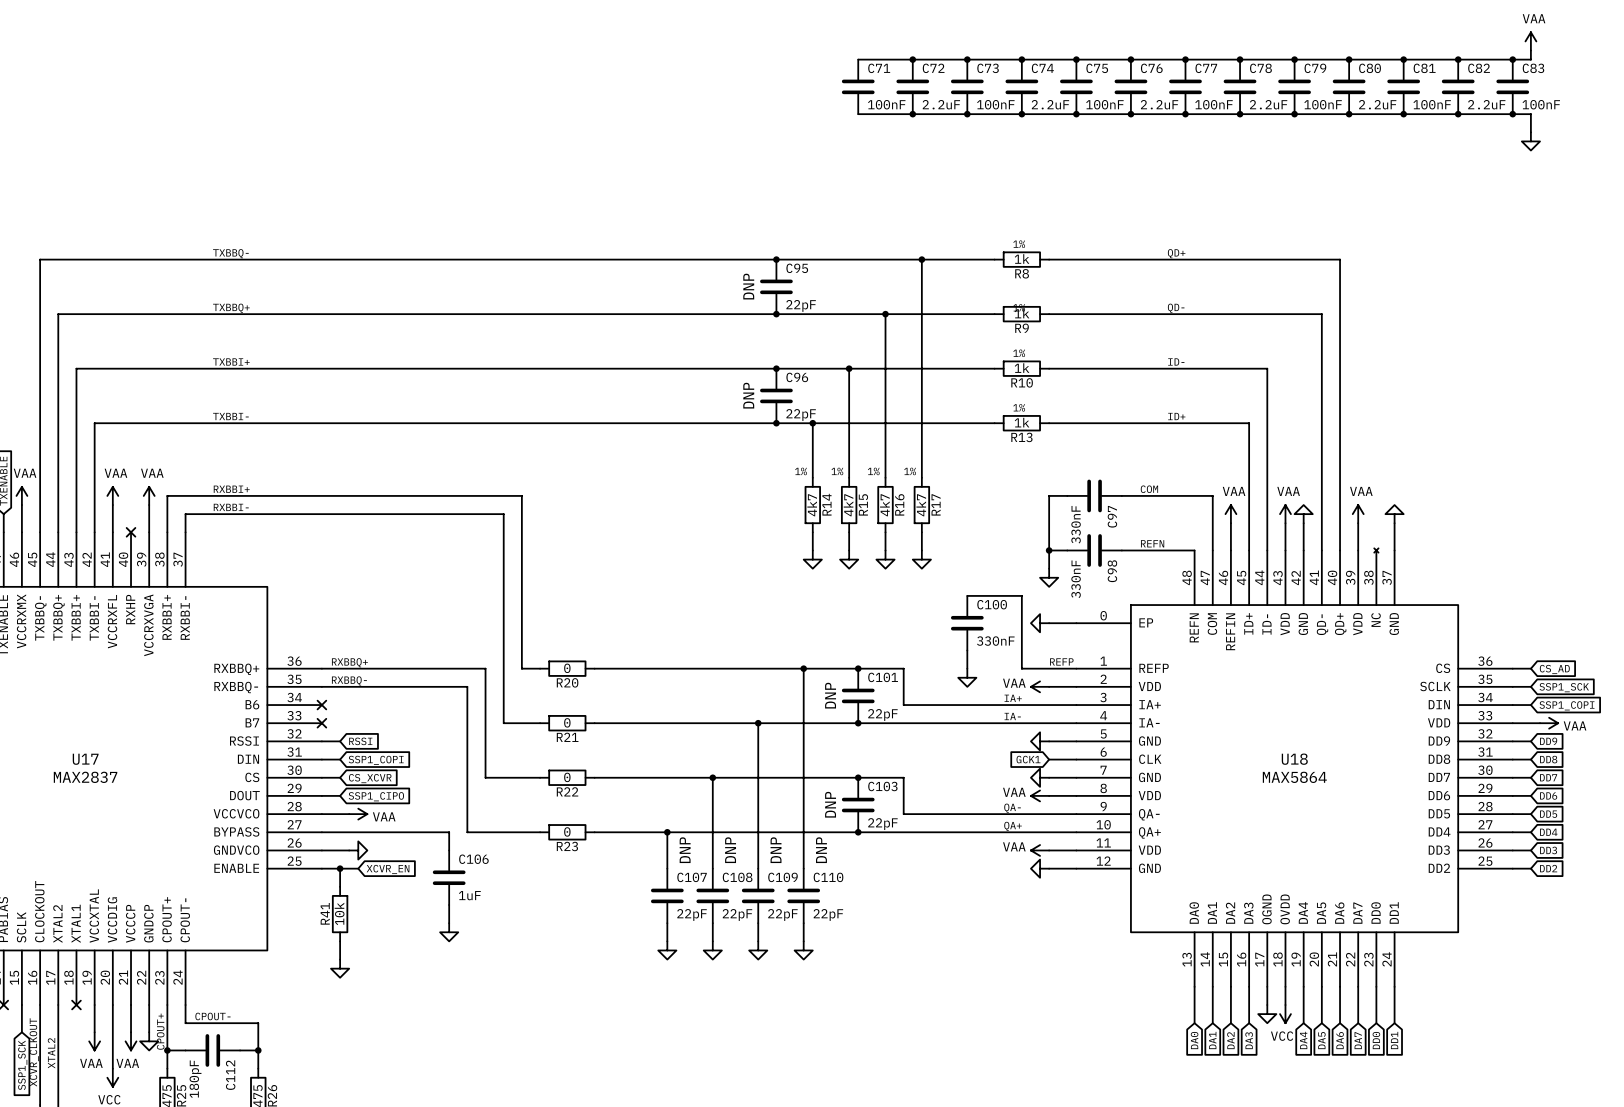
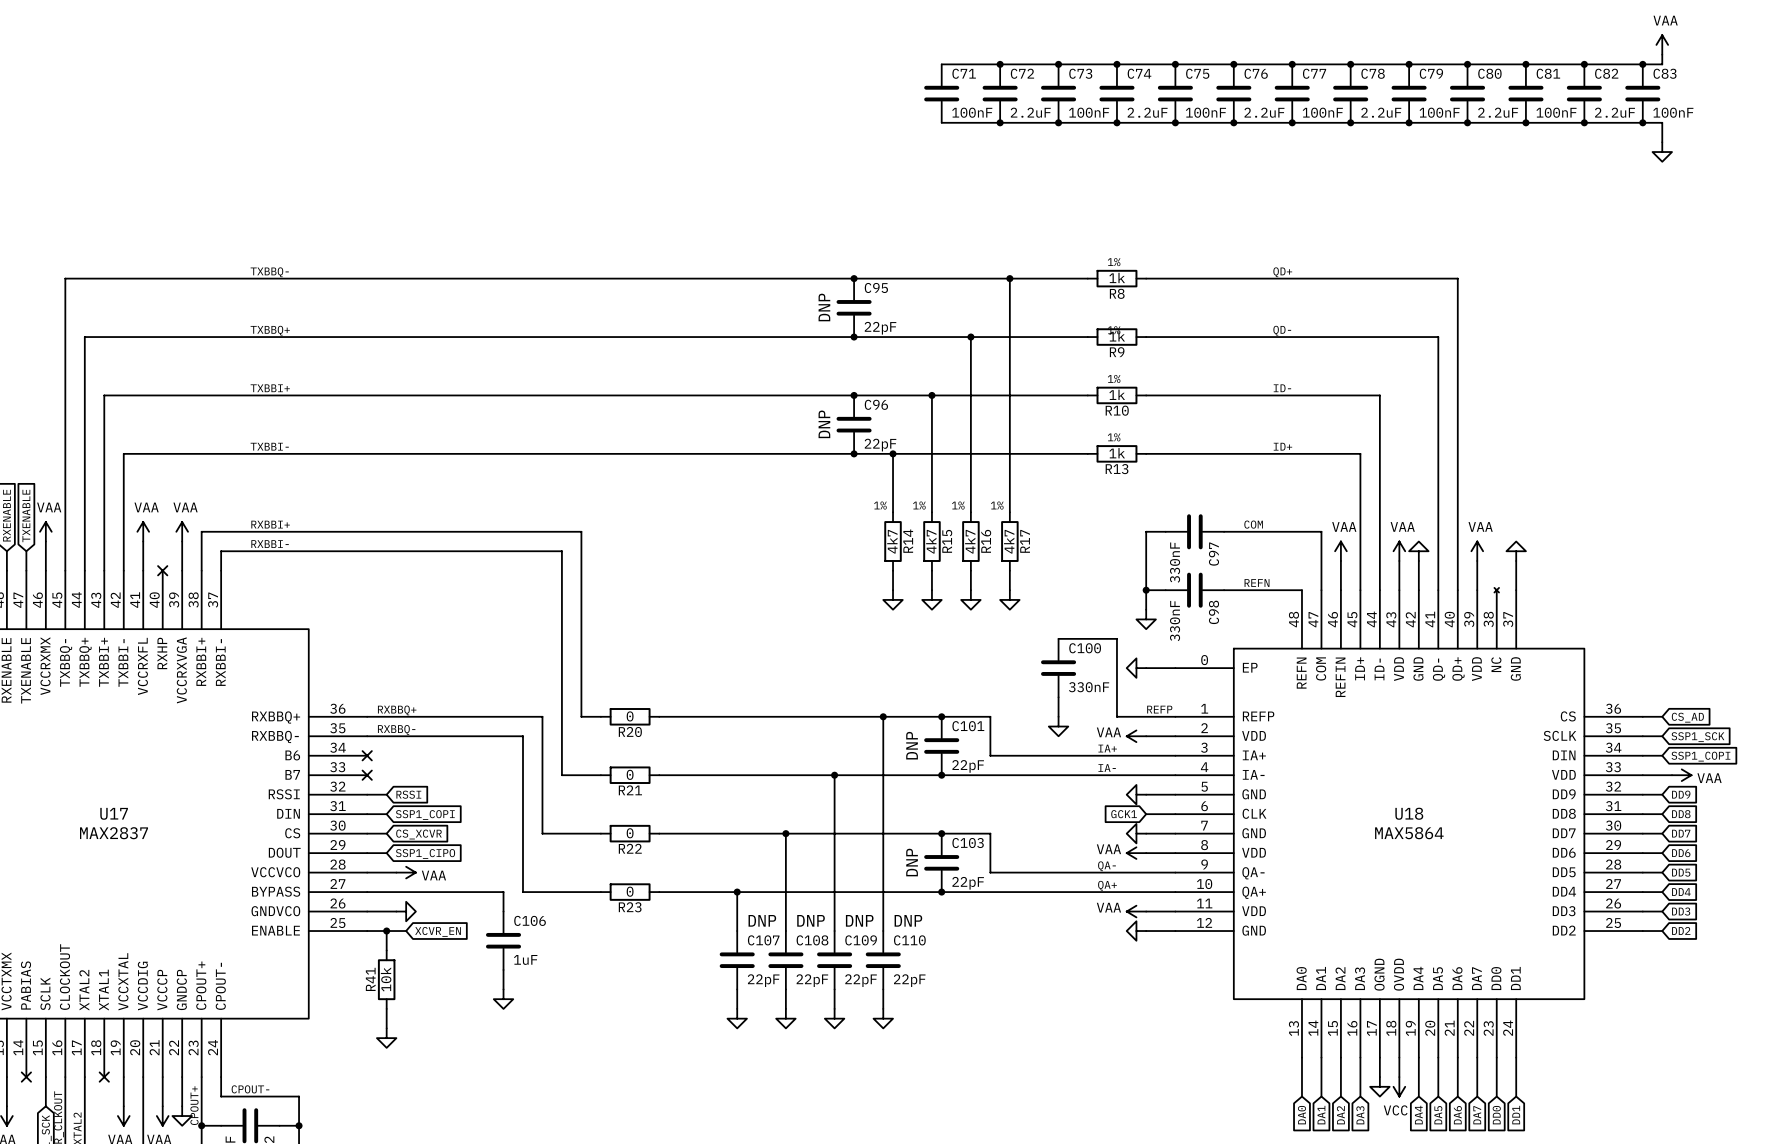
C107 text rotation: 0° (685, 850) -> 90° clockwise (762, 920)
C108 text rotation: 0° (730, 850) -> 90° clockwise (811, 920)
C109 text rotation: 0° (776, 850) -> 90° clockwise (859, 920)
C110 text rotation: 0° (821, 850) -> 90° clockwise (908, 920)

